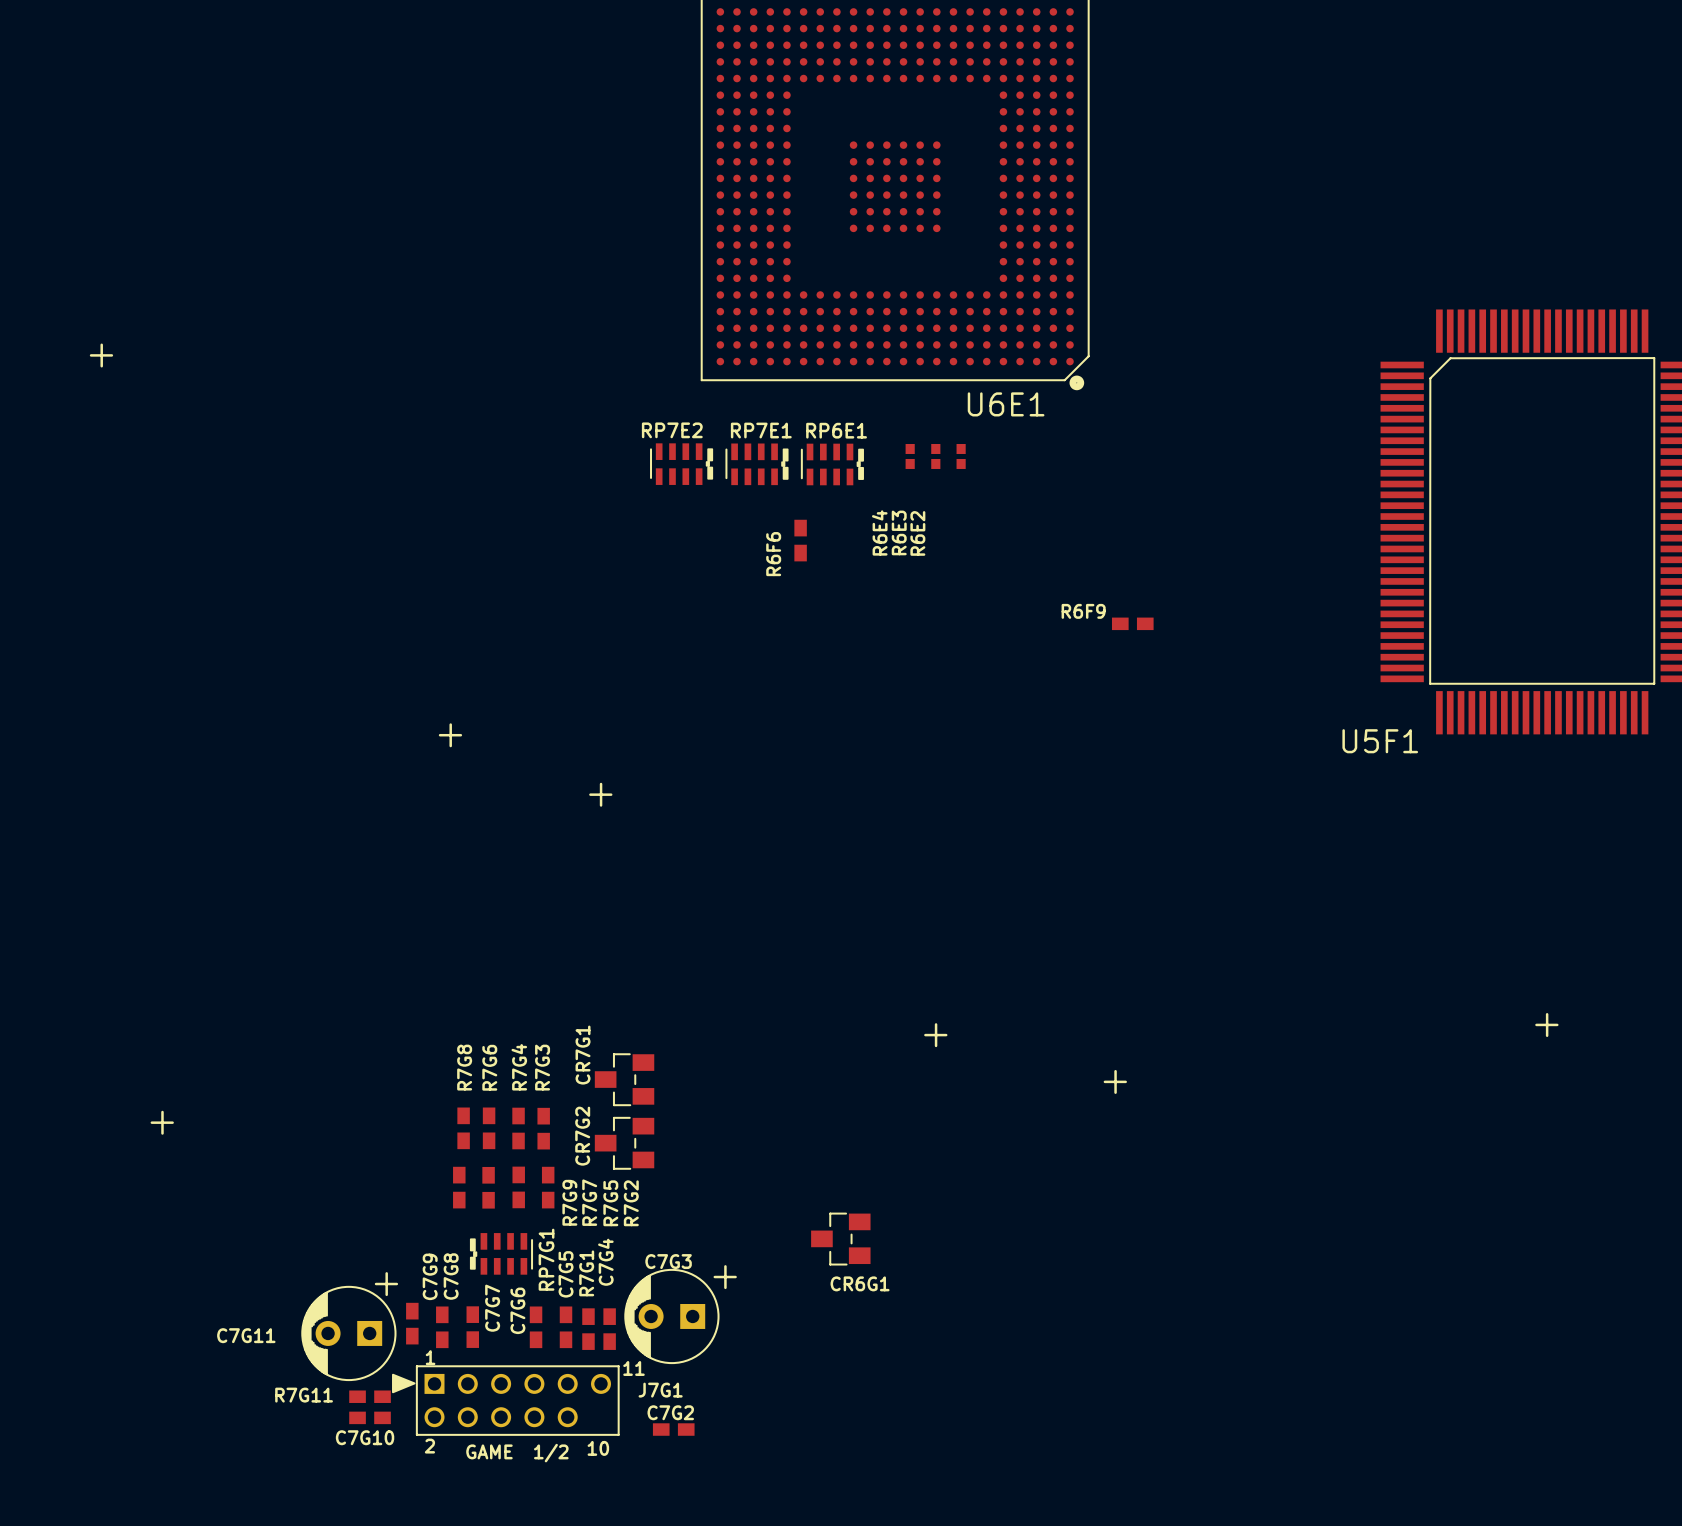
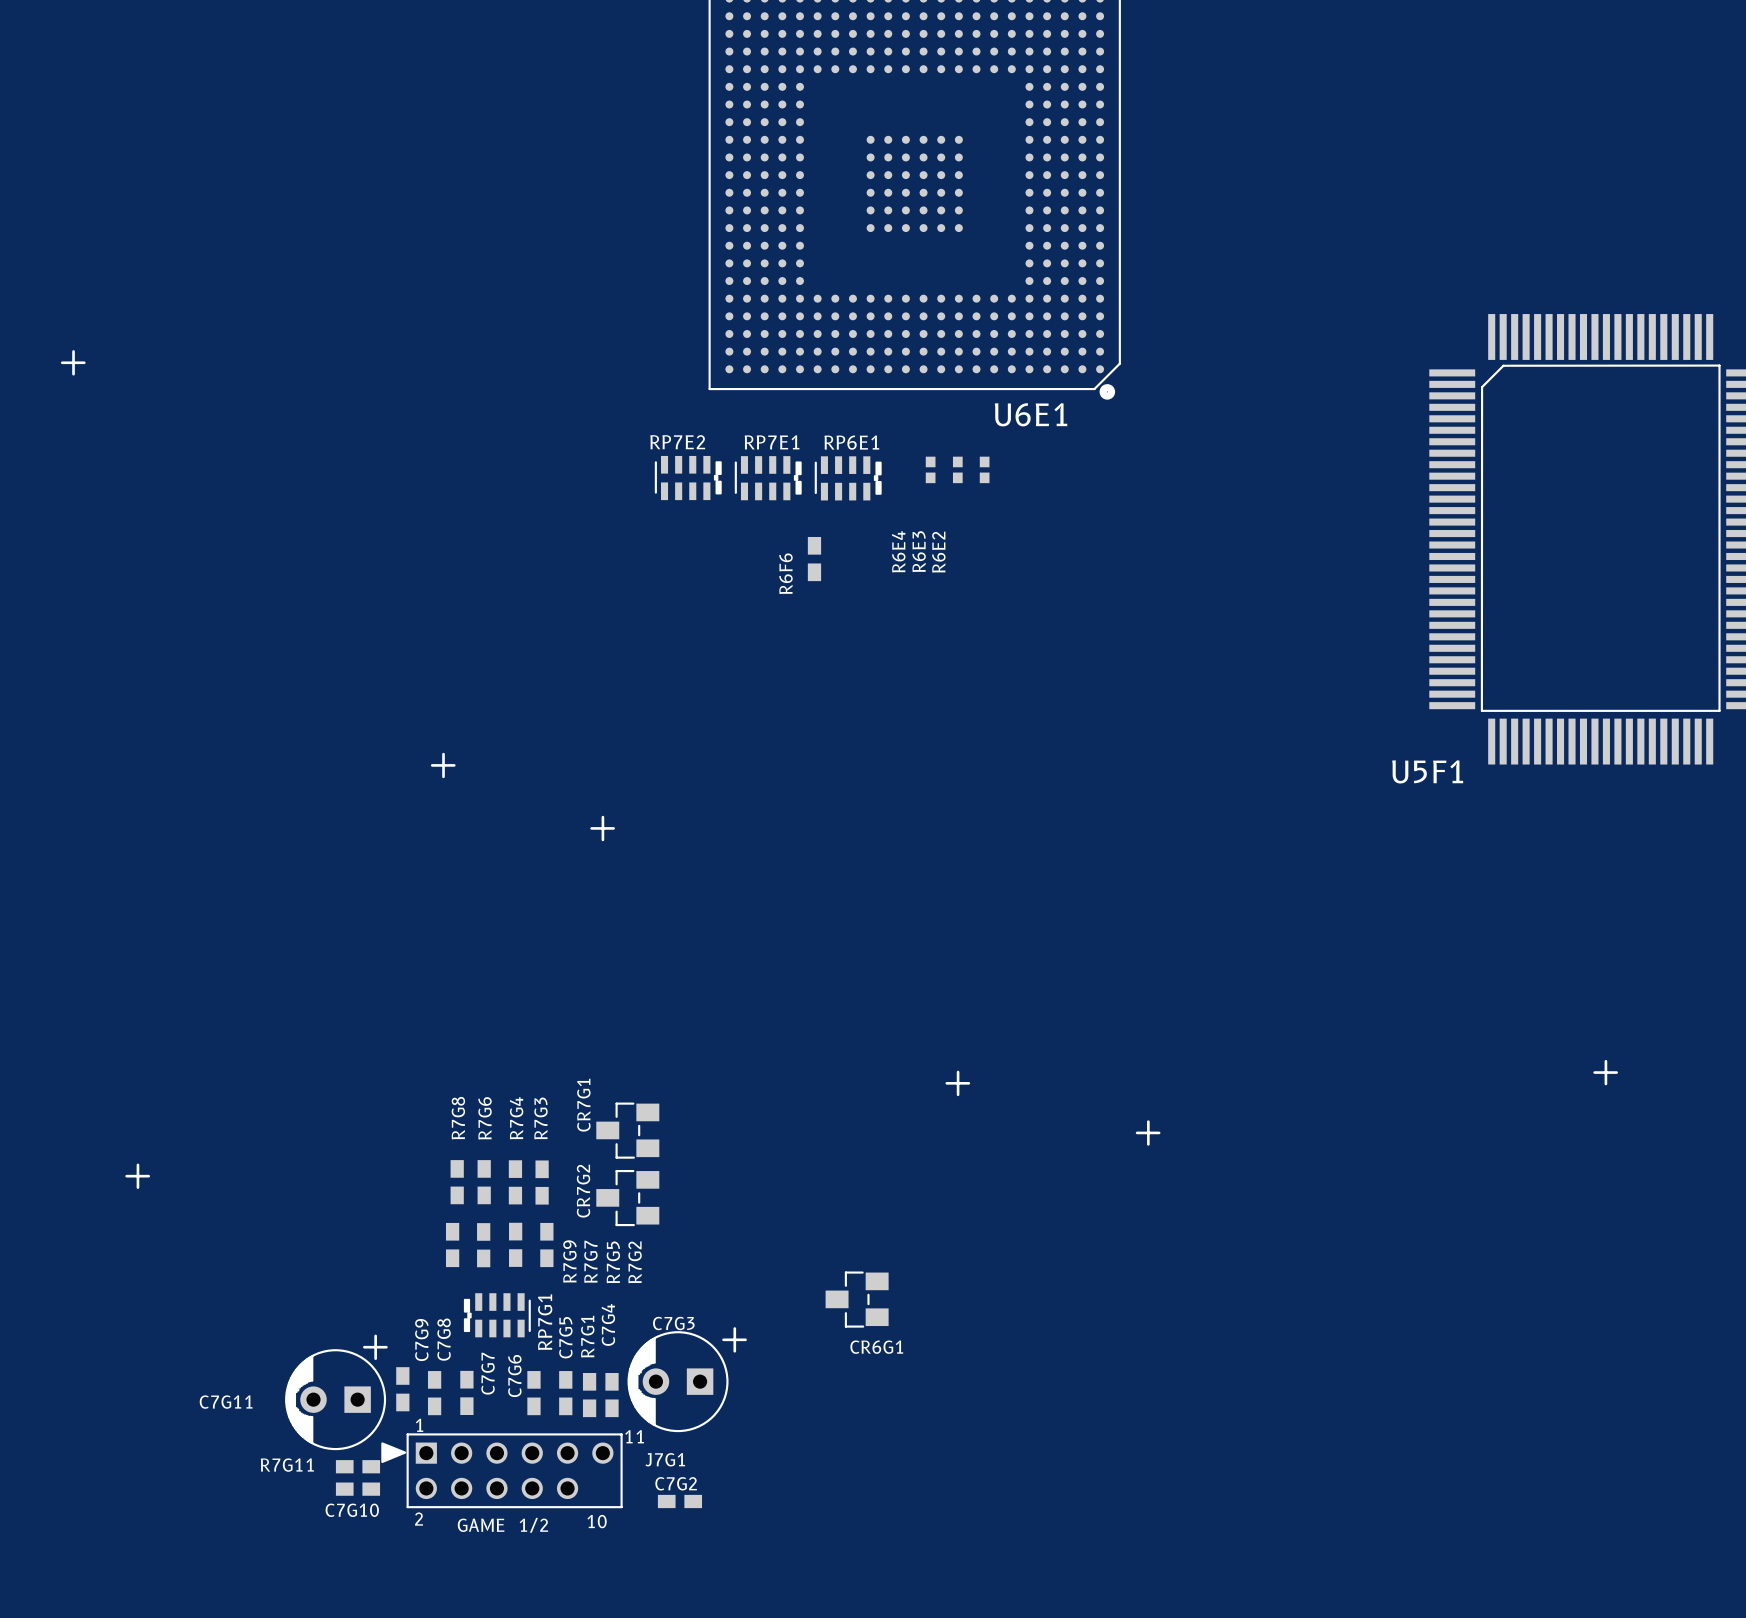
R6F9: (1132, 623) -> none

